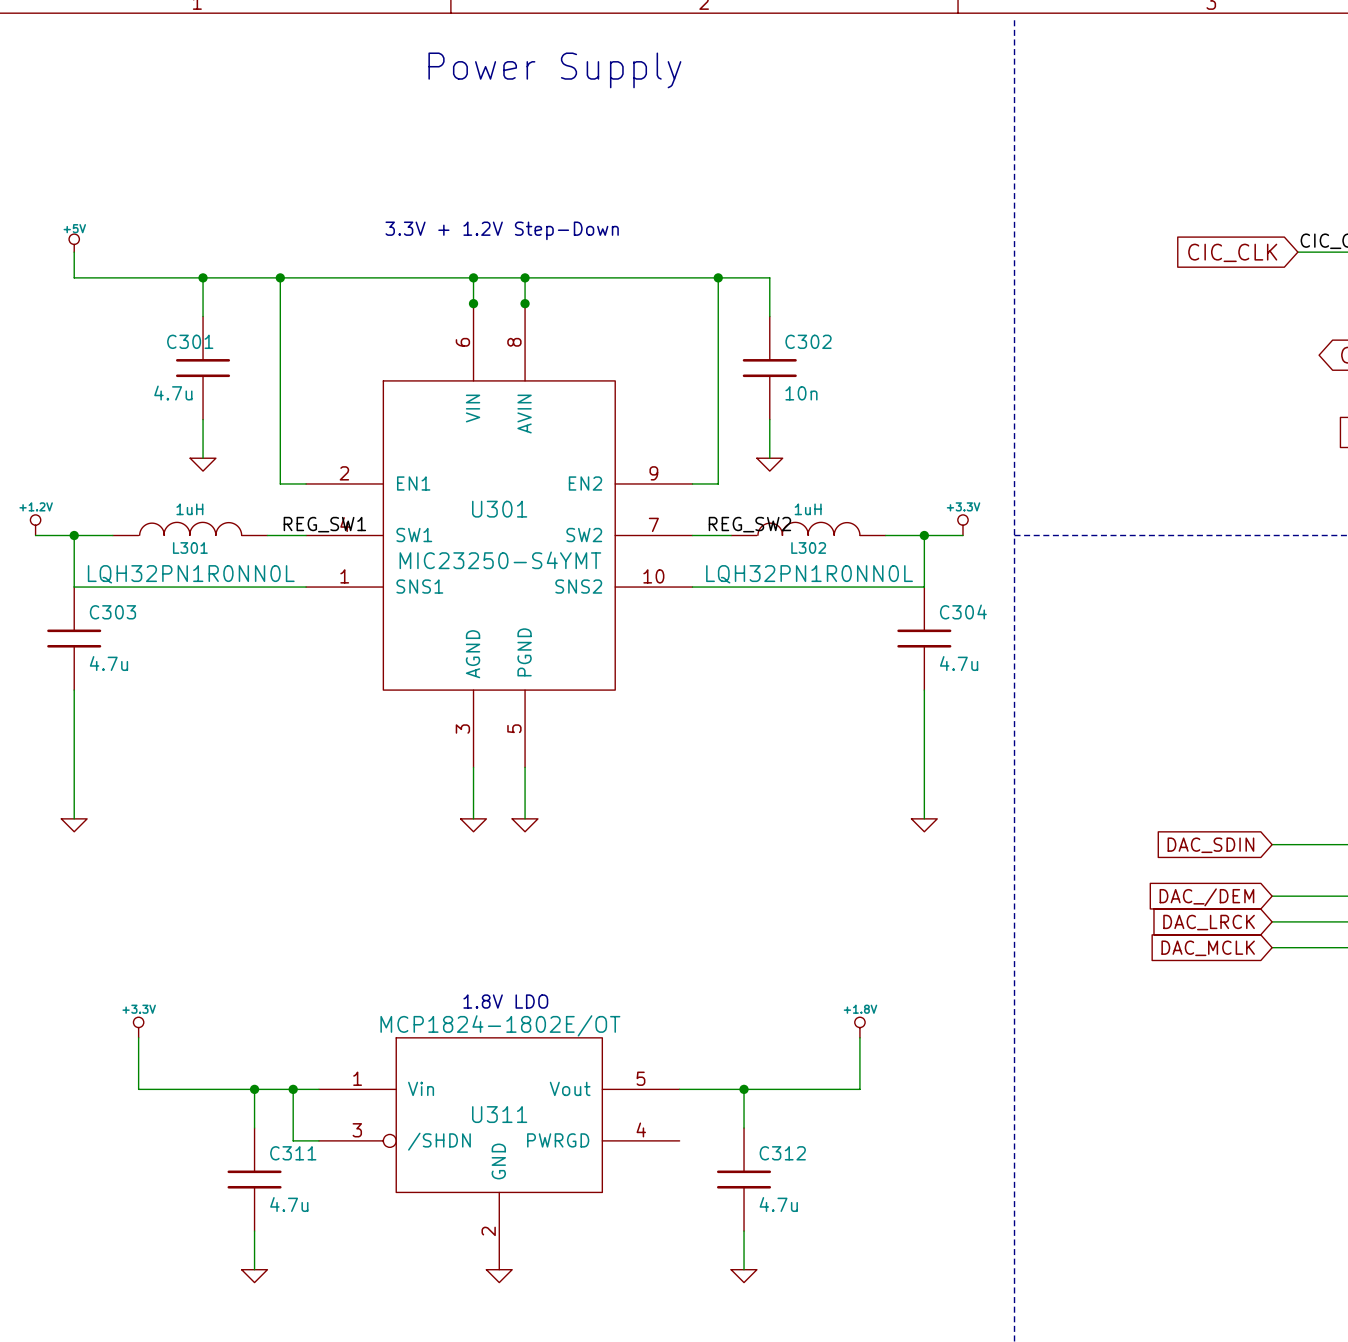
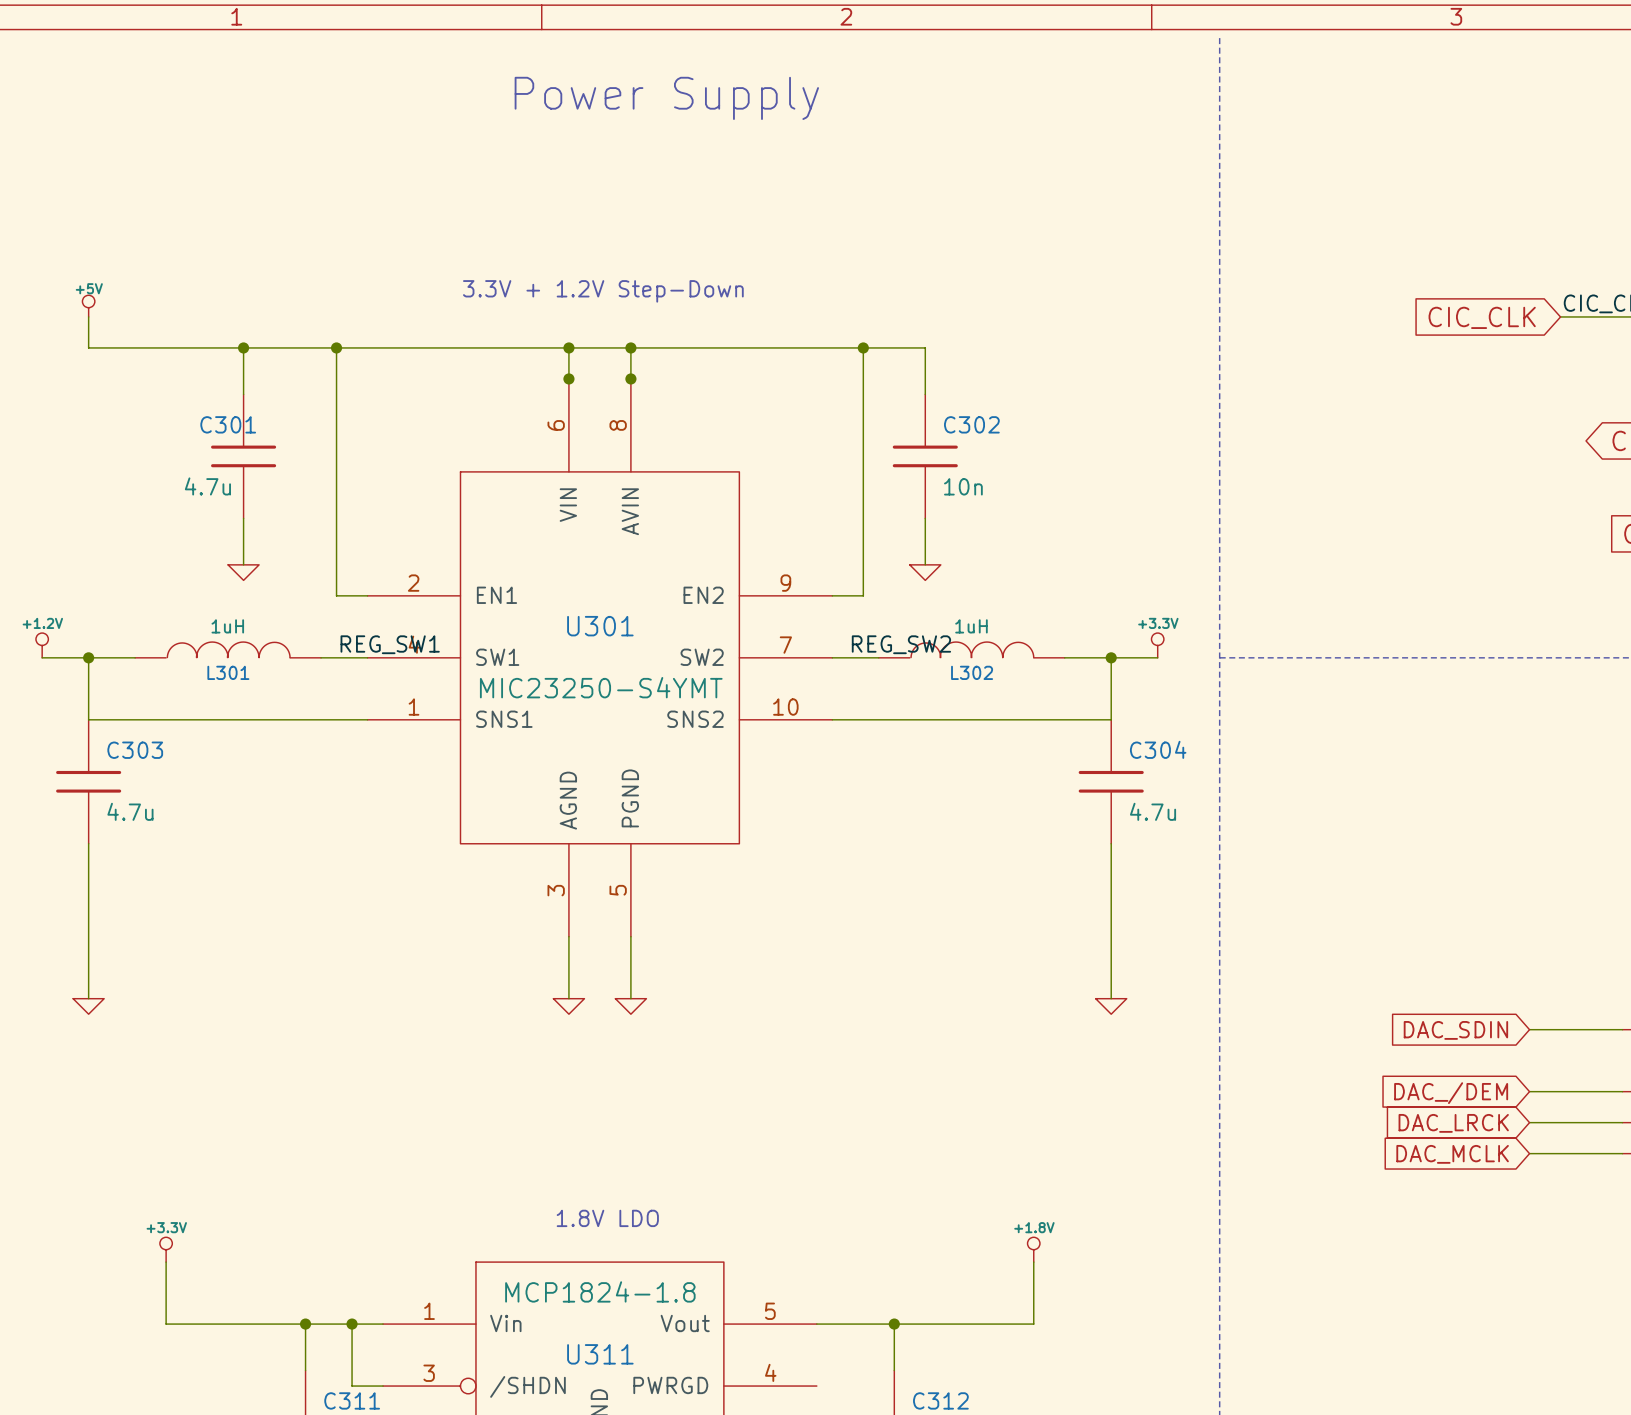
L301 text: LQH32PN1R0NN0L (191, 574) -> none
L302 text: LQH32PN1R0NN0L (809, 574) -> none
U311 value: MCP1824-1802E/OT (500, 1025) -> MCP1824-1.8 (600, 1291)

